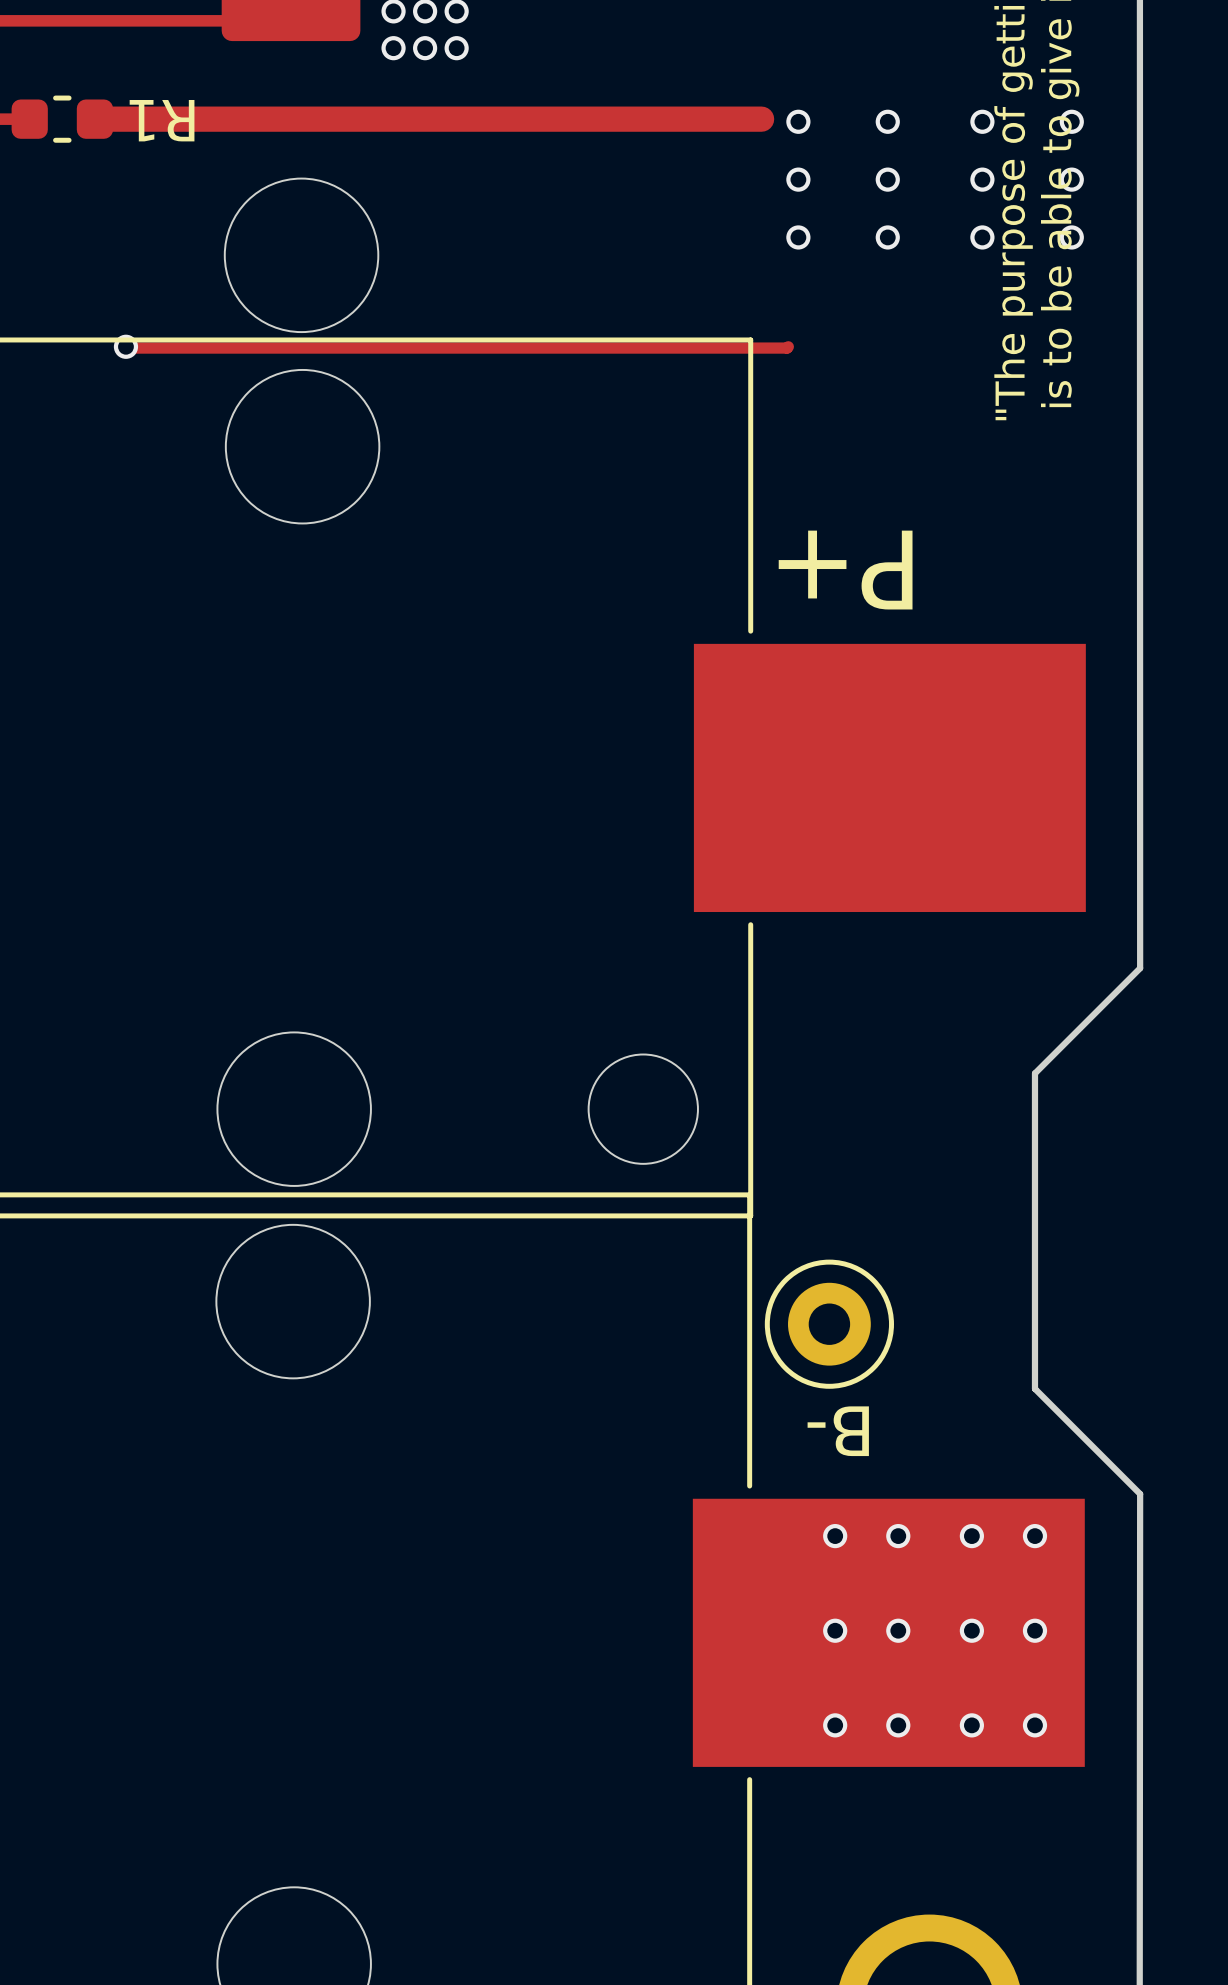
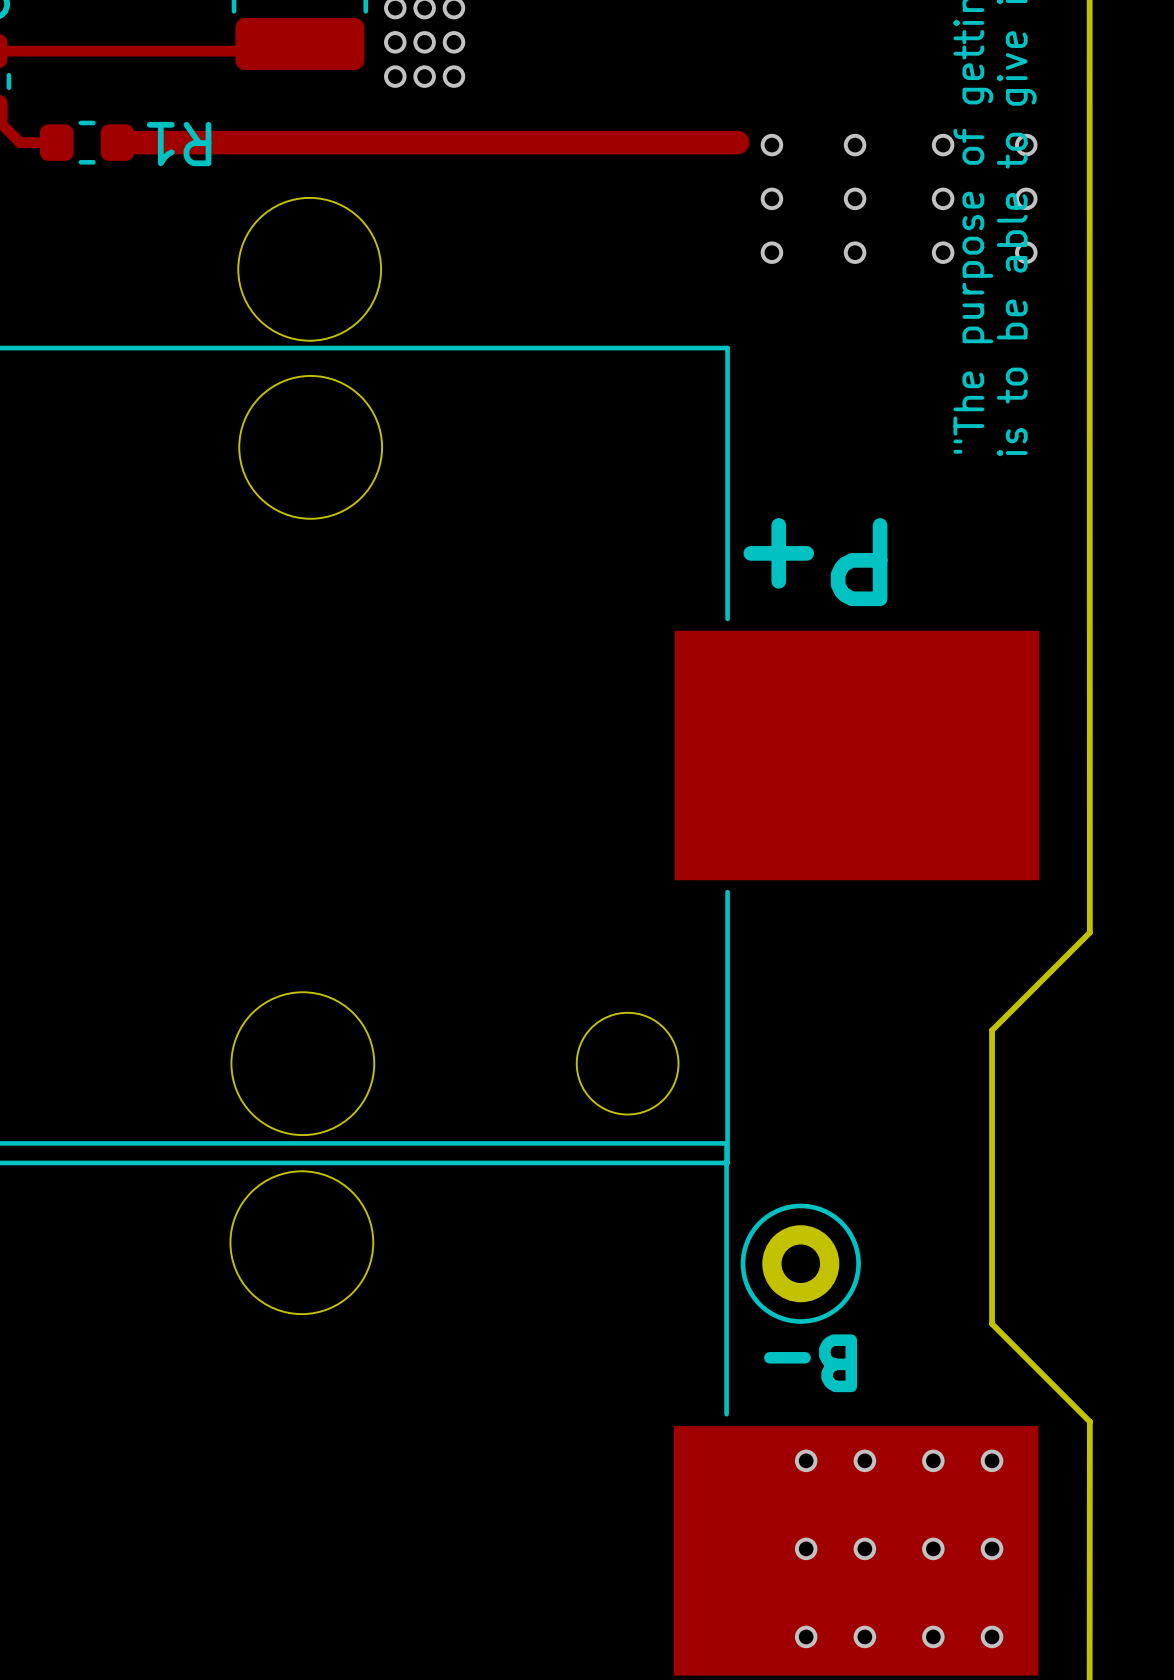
track: (125, 346) (788, 346) -> none
via: (125, 346) -> none

